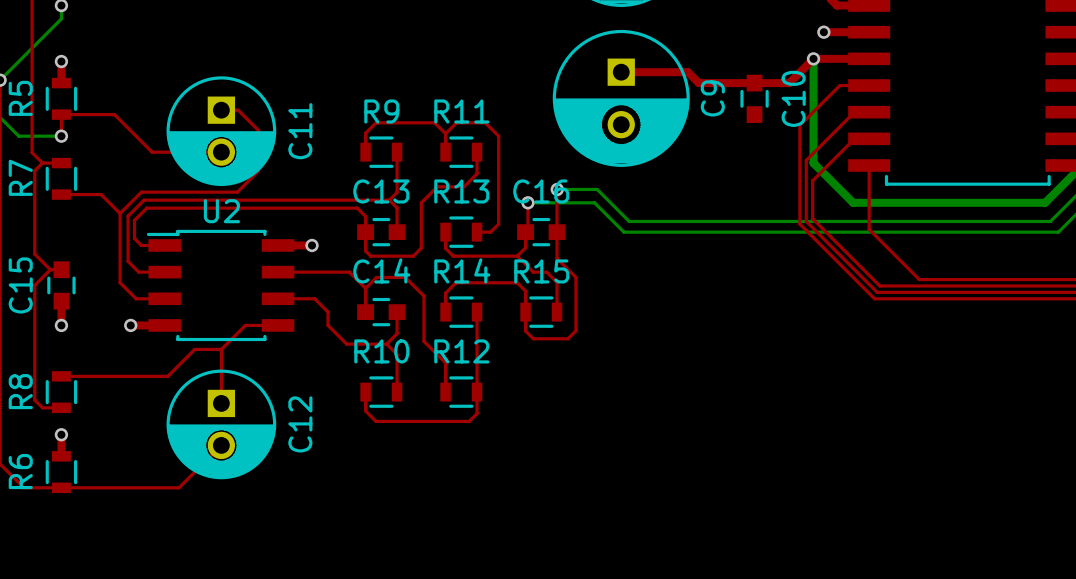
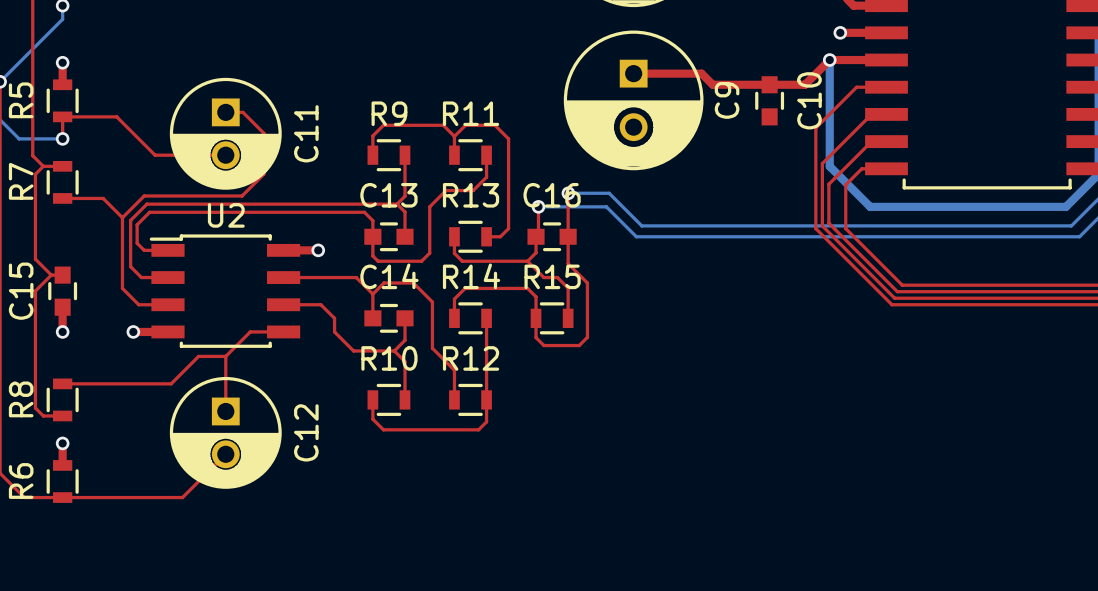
top track: (869, 165) (869, 229) (919, 279) -> (886, 168) (861, 168) (845, 184) (845, 228) (902, 285) (937, 285)

